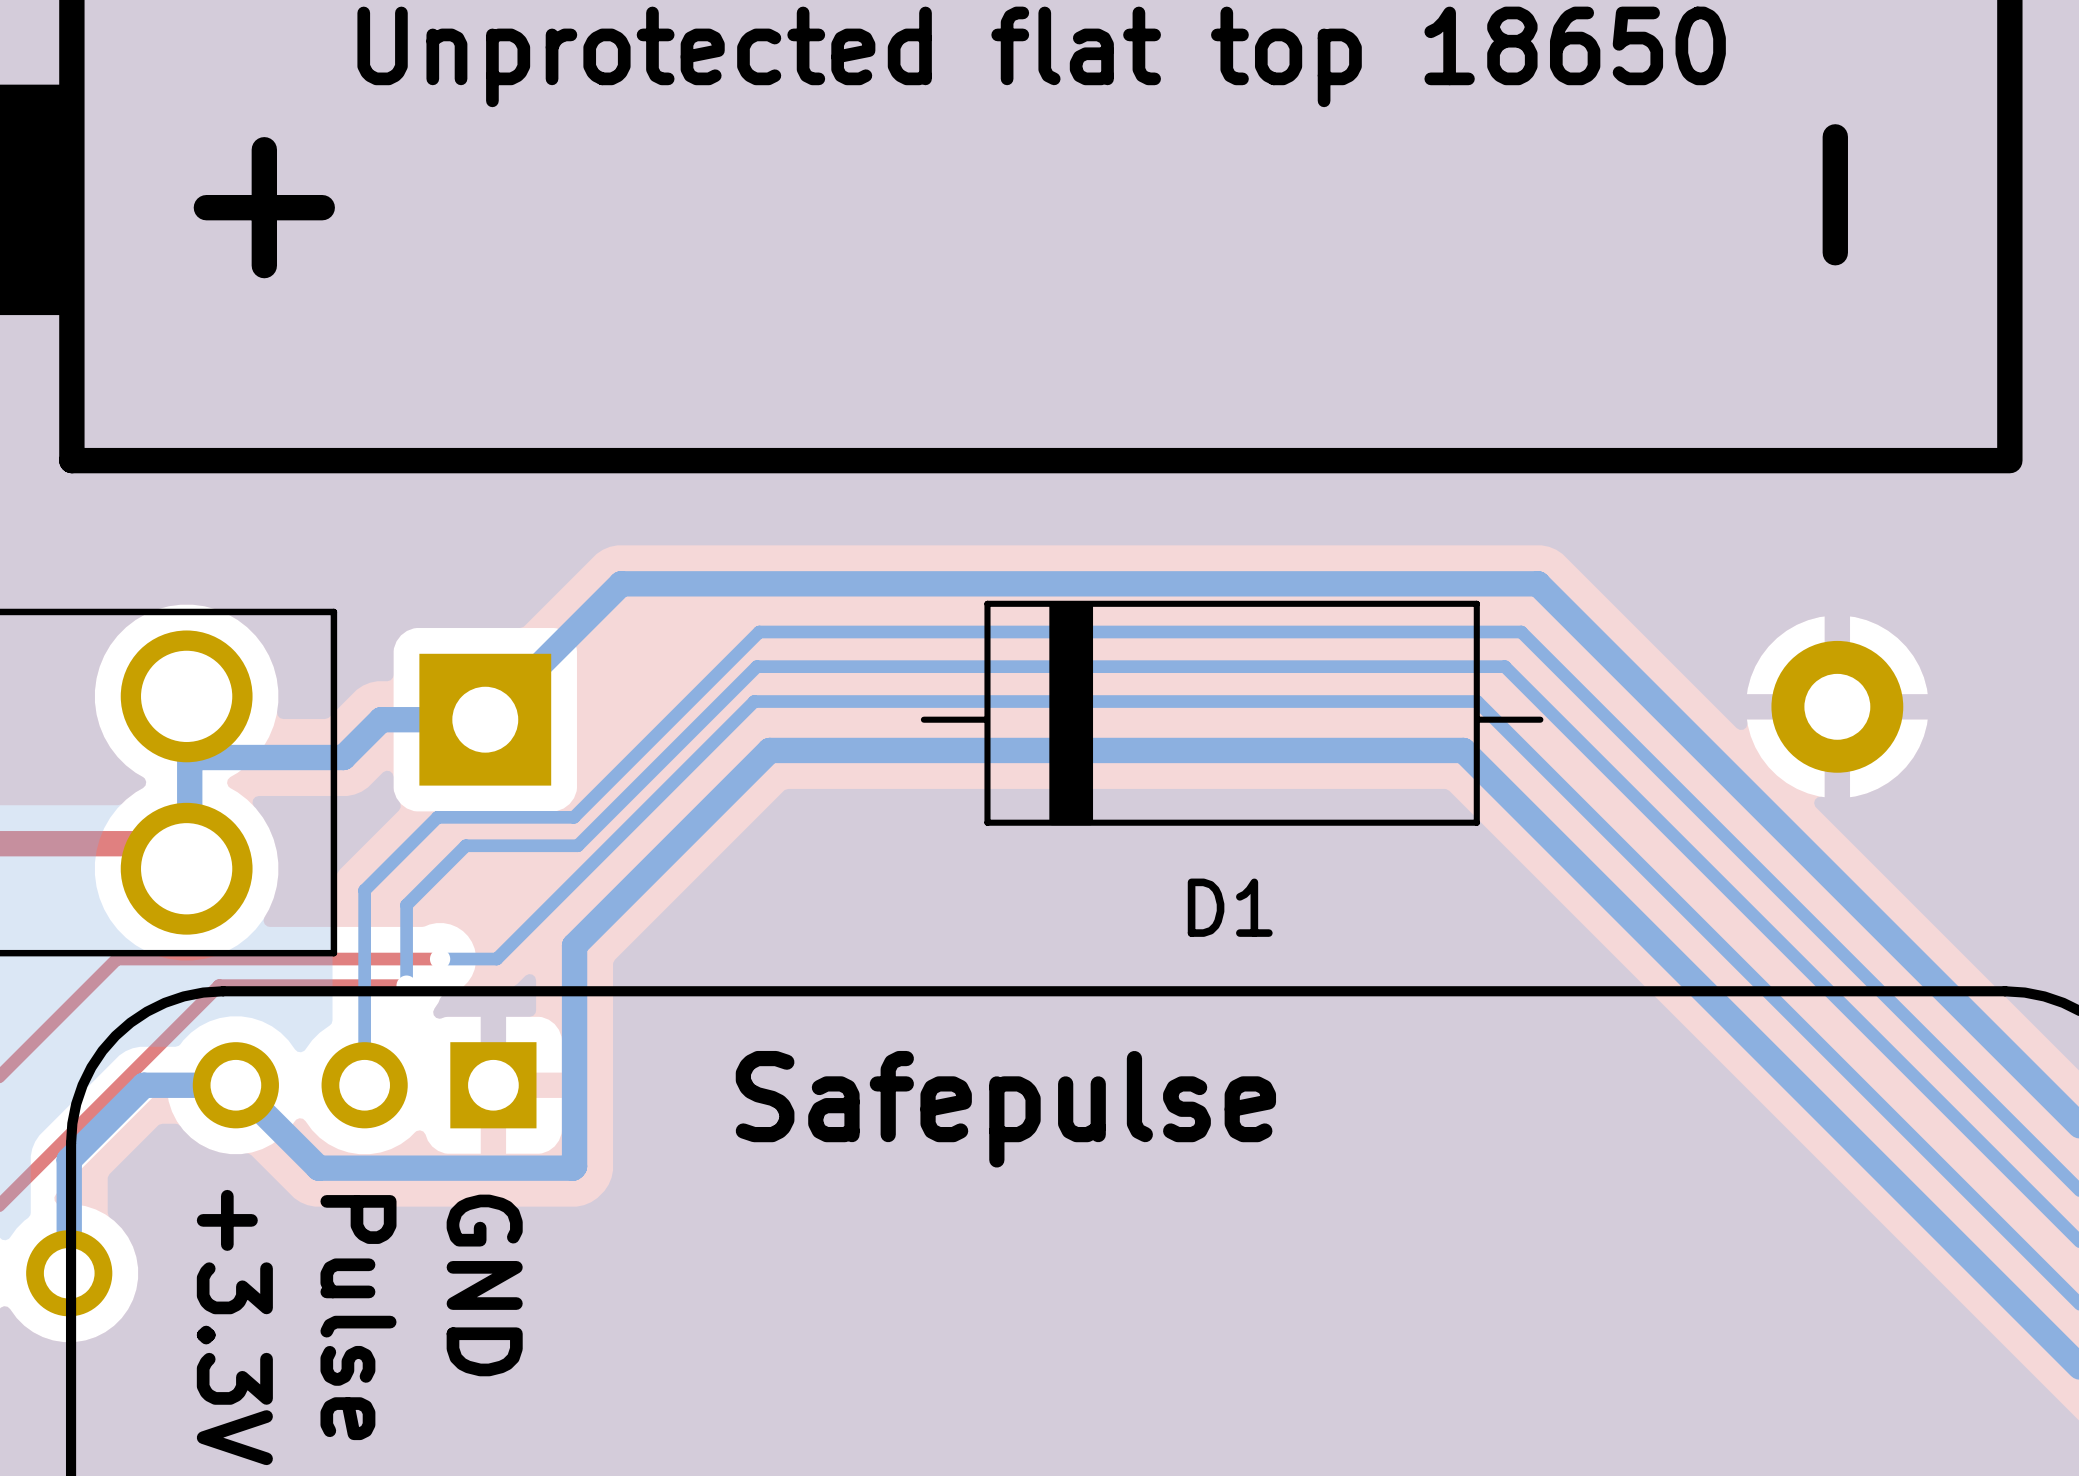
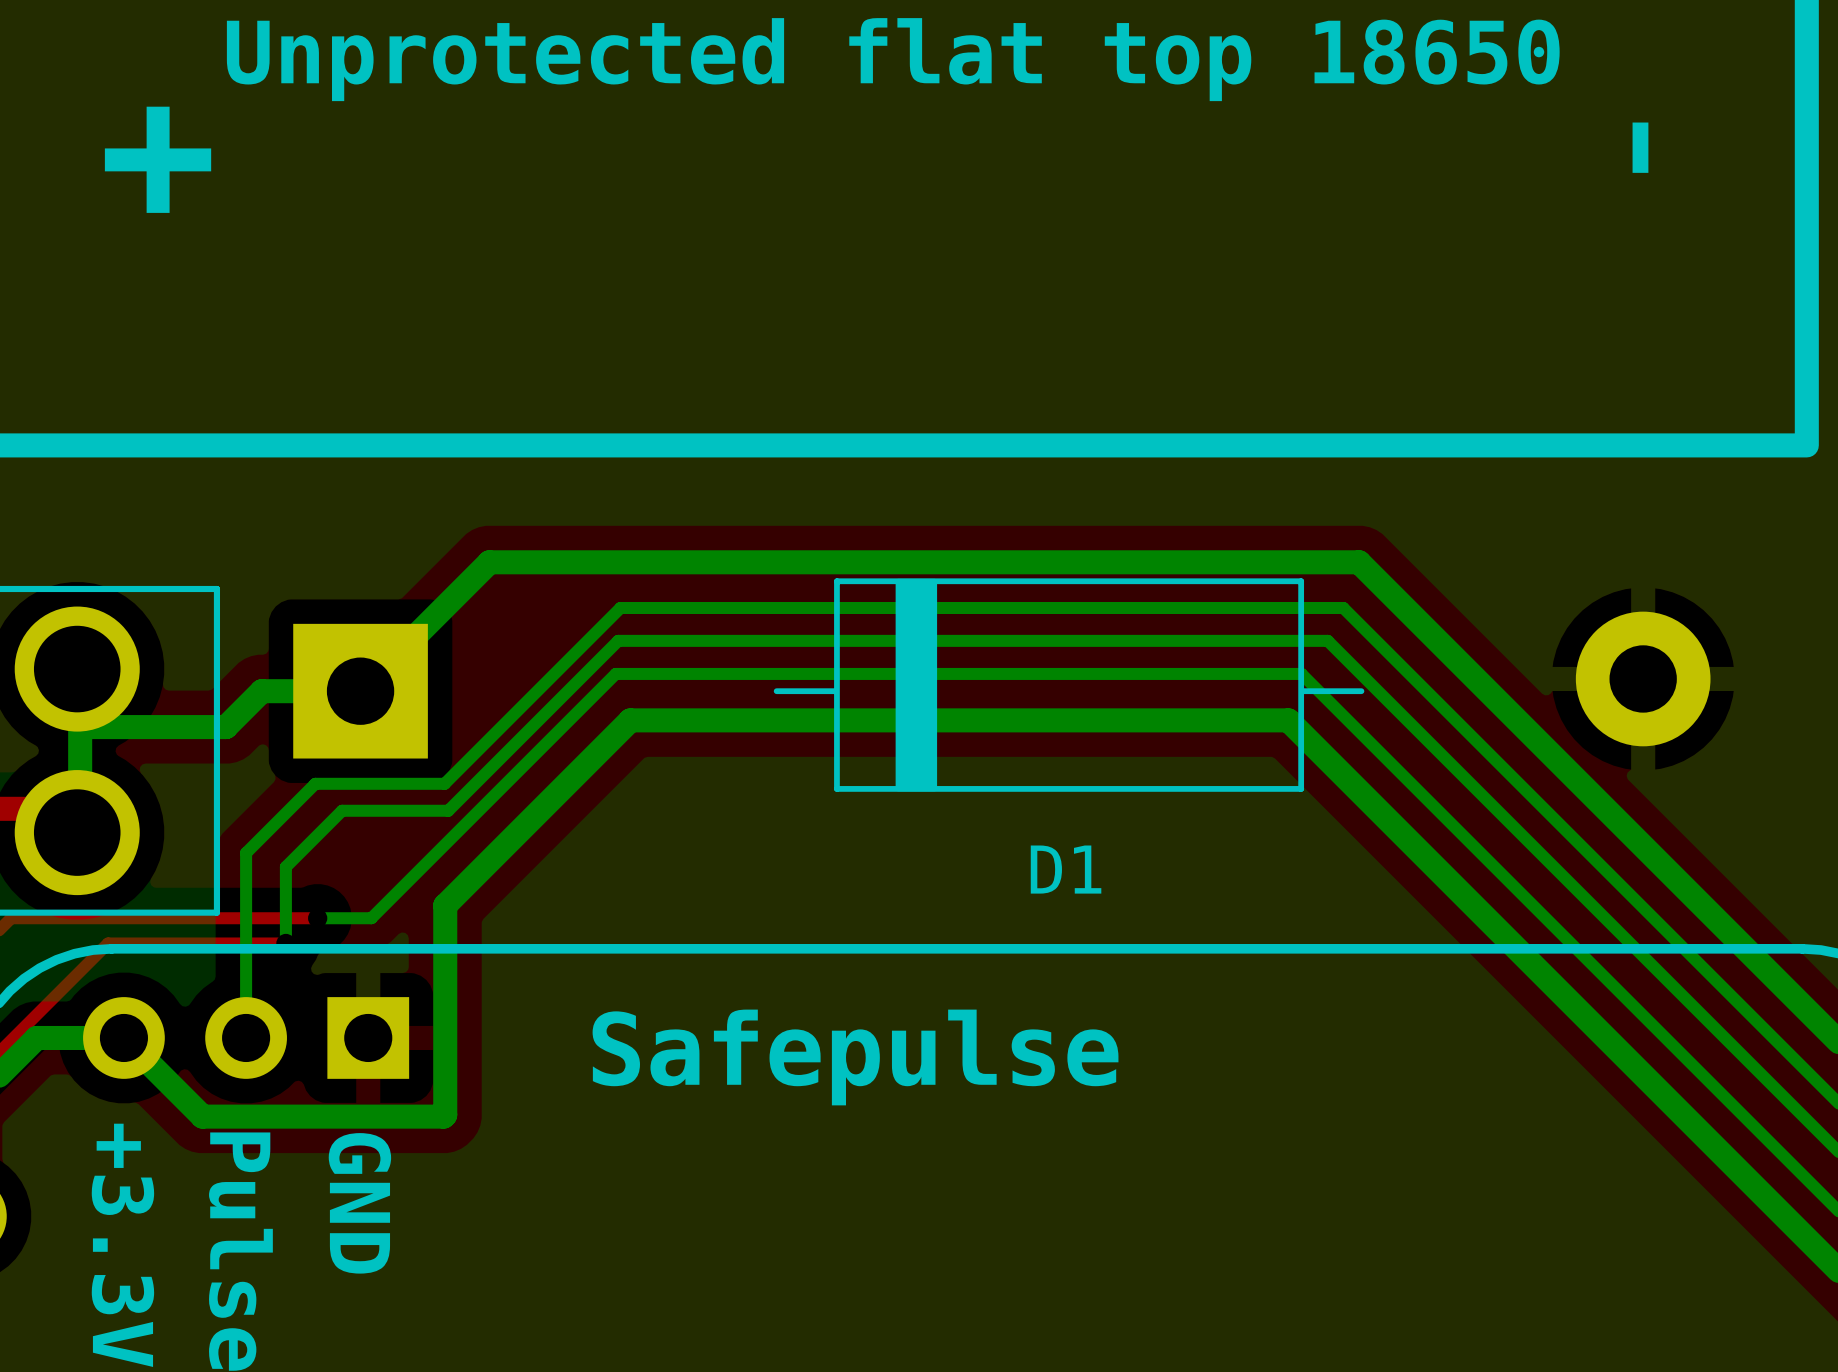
D1 footprint: [419, 600, 1904, 826] -> [293, 578, 1711, 792]

